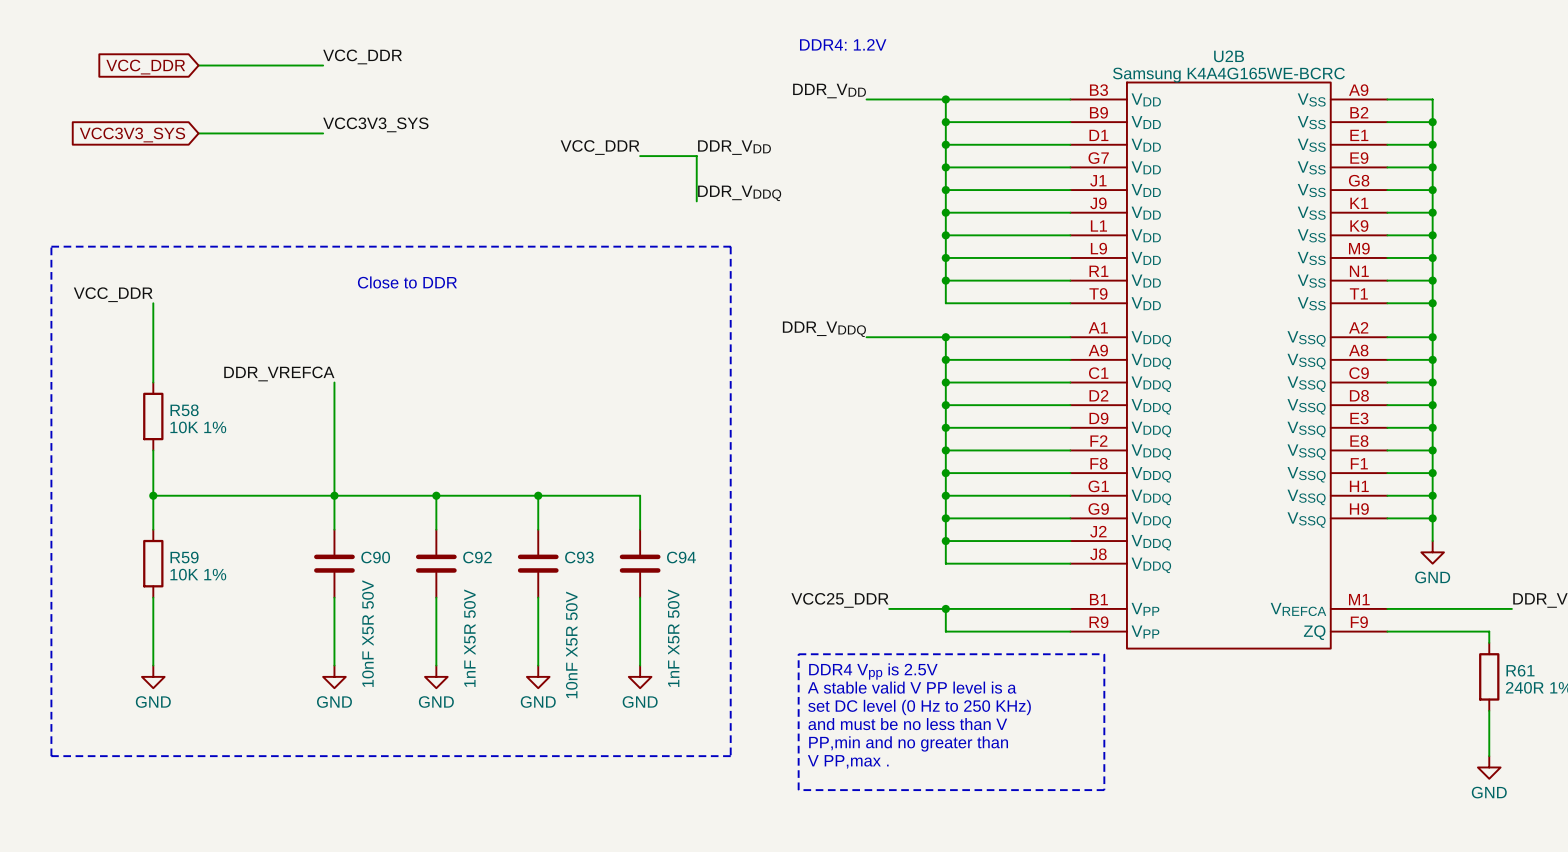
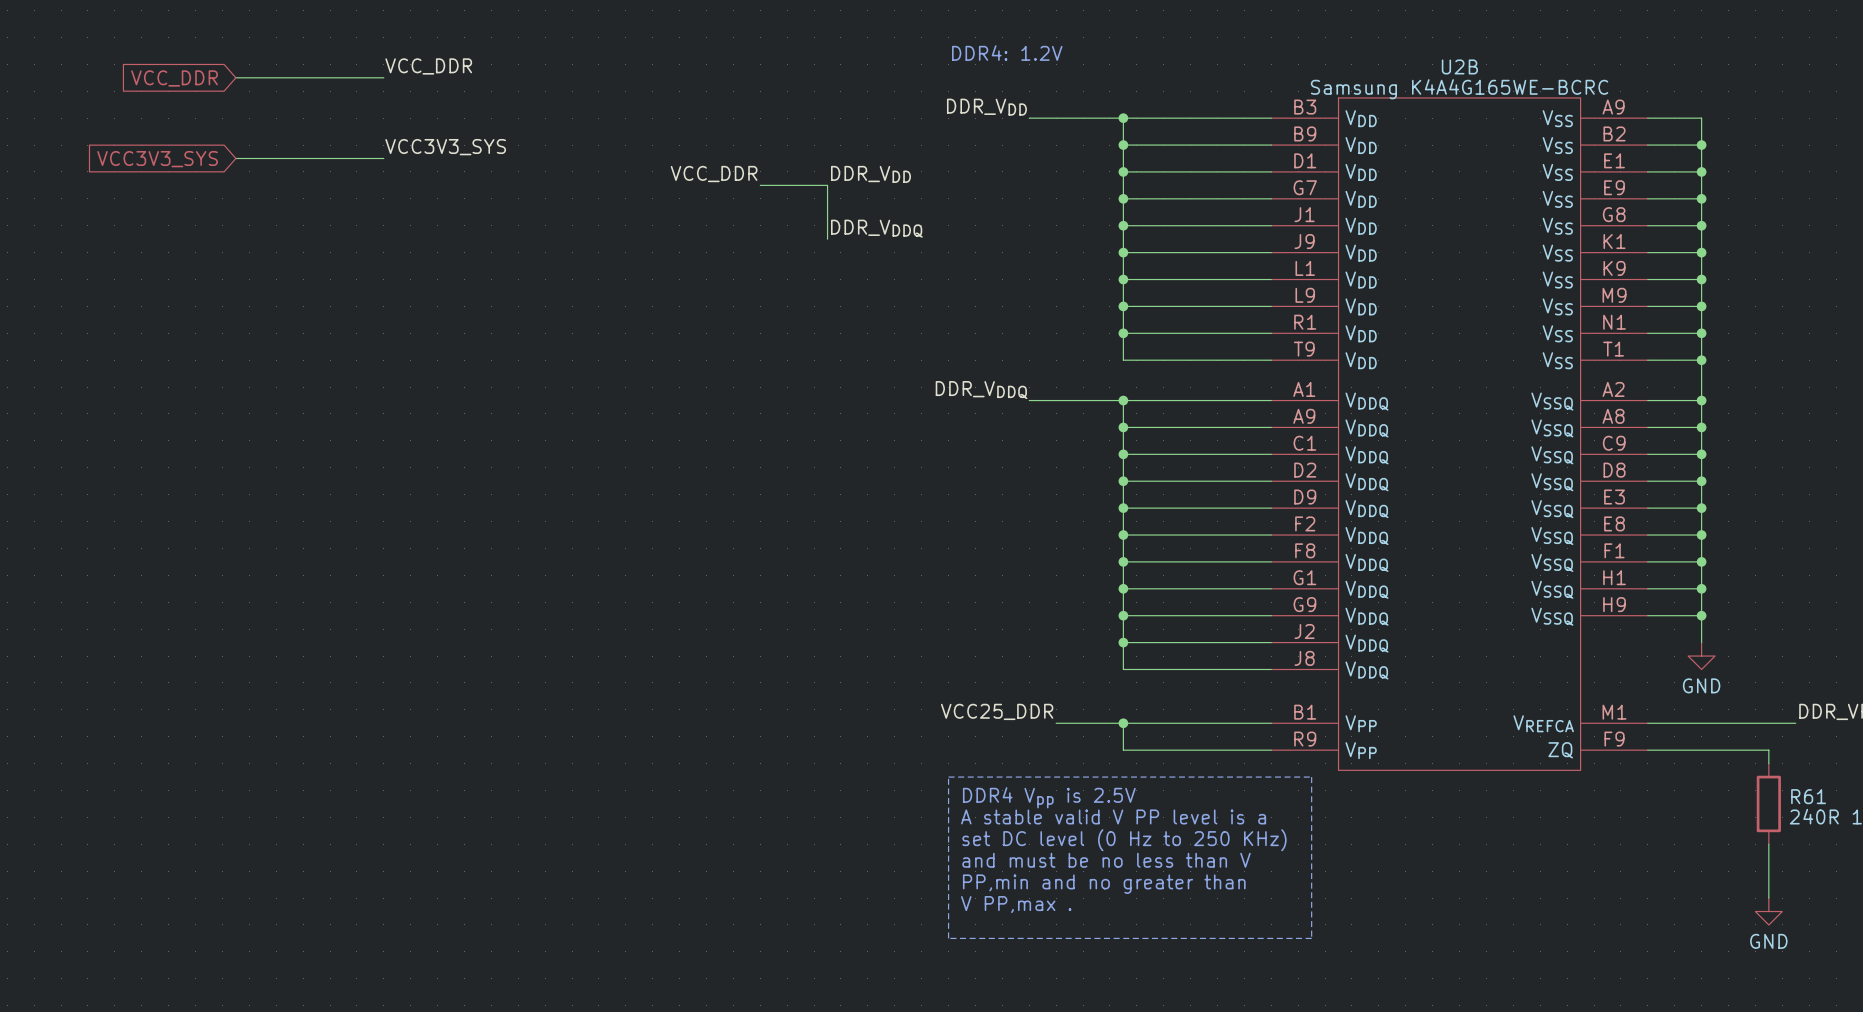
line: (51, 246) (730, 246) (730, 756) (51, 756) (51, 246) -> none
text: Close to DDR (407, 282) -> none
label: VCC_DDR (113, 294) -> none
wire: (153, 303) (153, 382) -> none
label: DDR_VREFCA (279, 373) -> none
wire: (334, 382) (334, 529) -> none
R58: 10K 1% (153, 416) -> none
wire: (153, 450) (153, 529) -> none
wire: (153, 495) (640, 495) (640, 529) -> none
junction: (153, 495) -> none
junction: (334, 495) -> none
wire: (436, 495) (436, 529) -> none
junction: (436, 495) -> none
wire: (538, 495) (538, 529) -> none
junction: (538, 495) -> none
R59: 10K 1% (153, 563) -> none
C90: 10nF X5R 50V (334, 563) -> none
C92: 1nF X5R 50V (436, 563) -> none
C93: 10nF X5R 50V (538, 563) -> none
C94: 1nF X5R 50V (640, 563) -> none
wire: (153, 597) (153, 665) -> none
wire: (334, 597) (334, 665) -> none
wire: (436, 597) (436, 665) -> none
wire: (538, 597) (538, 665) -> none
wire: (640, 597) (640, 665) -> none
power symbol: GND (153, 676) -> none
power symbol: GND (334, 676) -> none
power symbol: GND (436, 676) -> none
power symbol: GND (538, 676) -> none
power symbol: GND (640, 676) -> none

